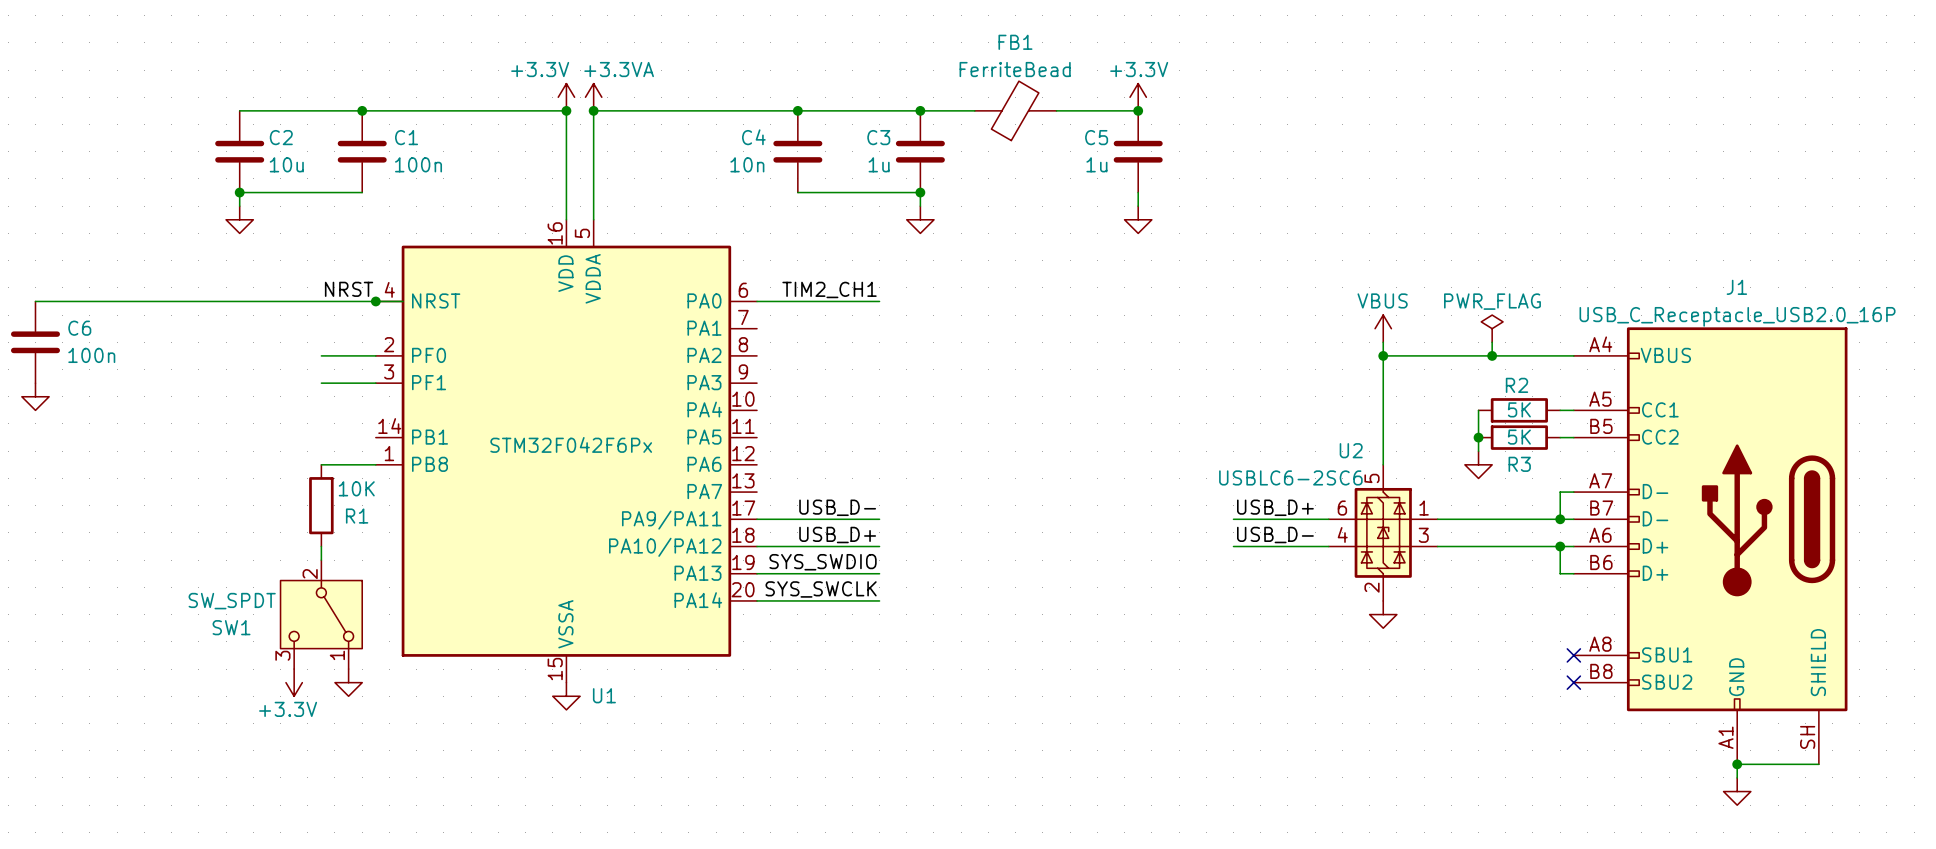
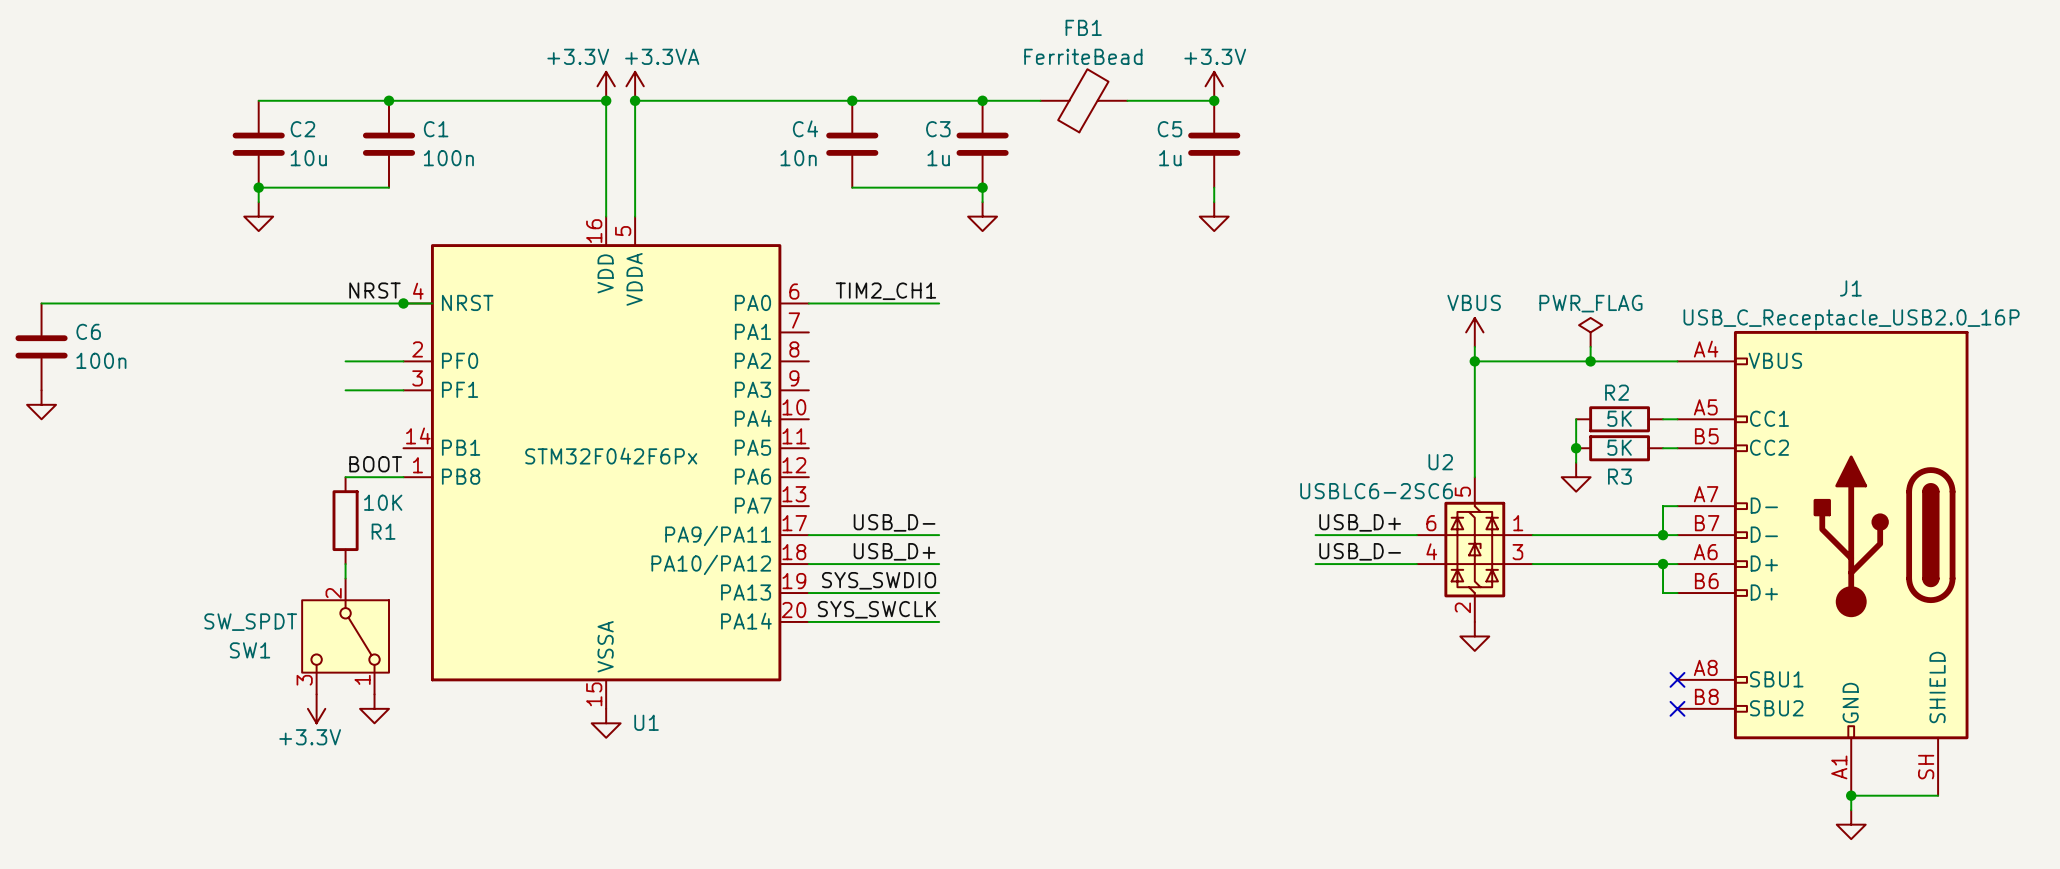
label: none -> BOOT (375, 464)

